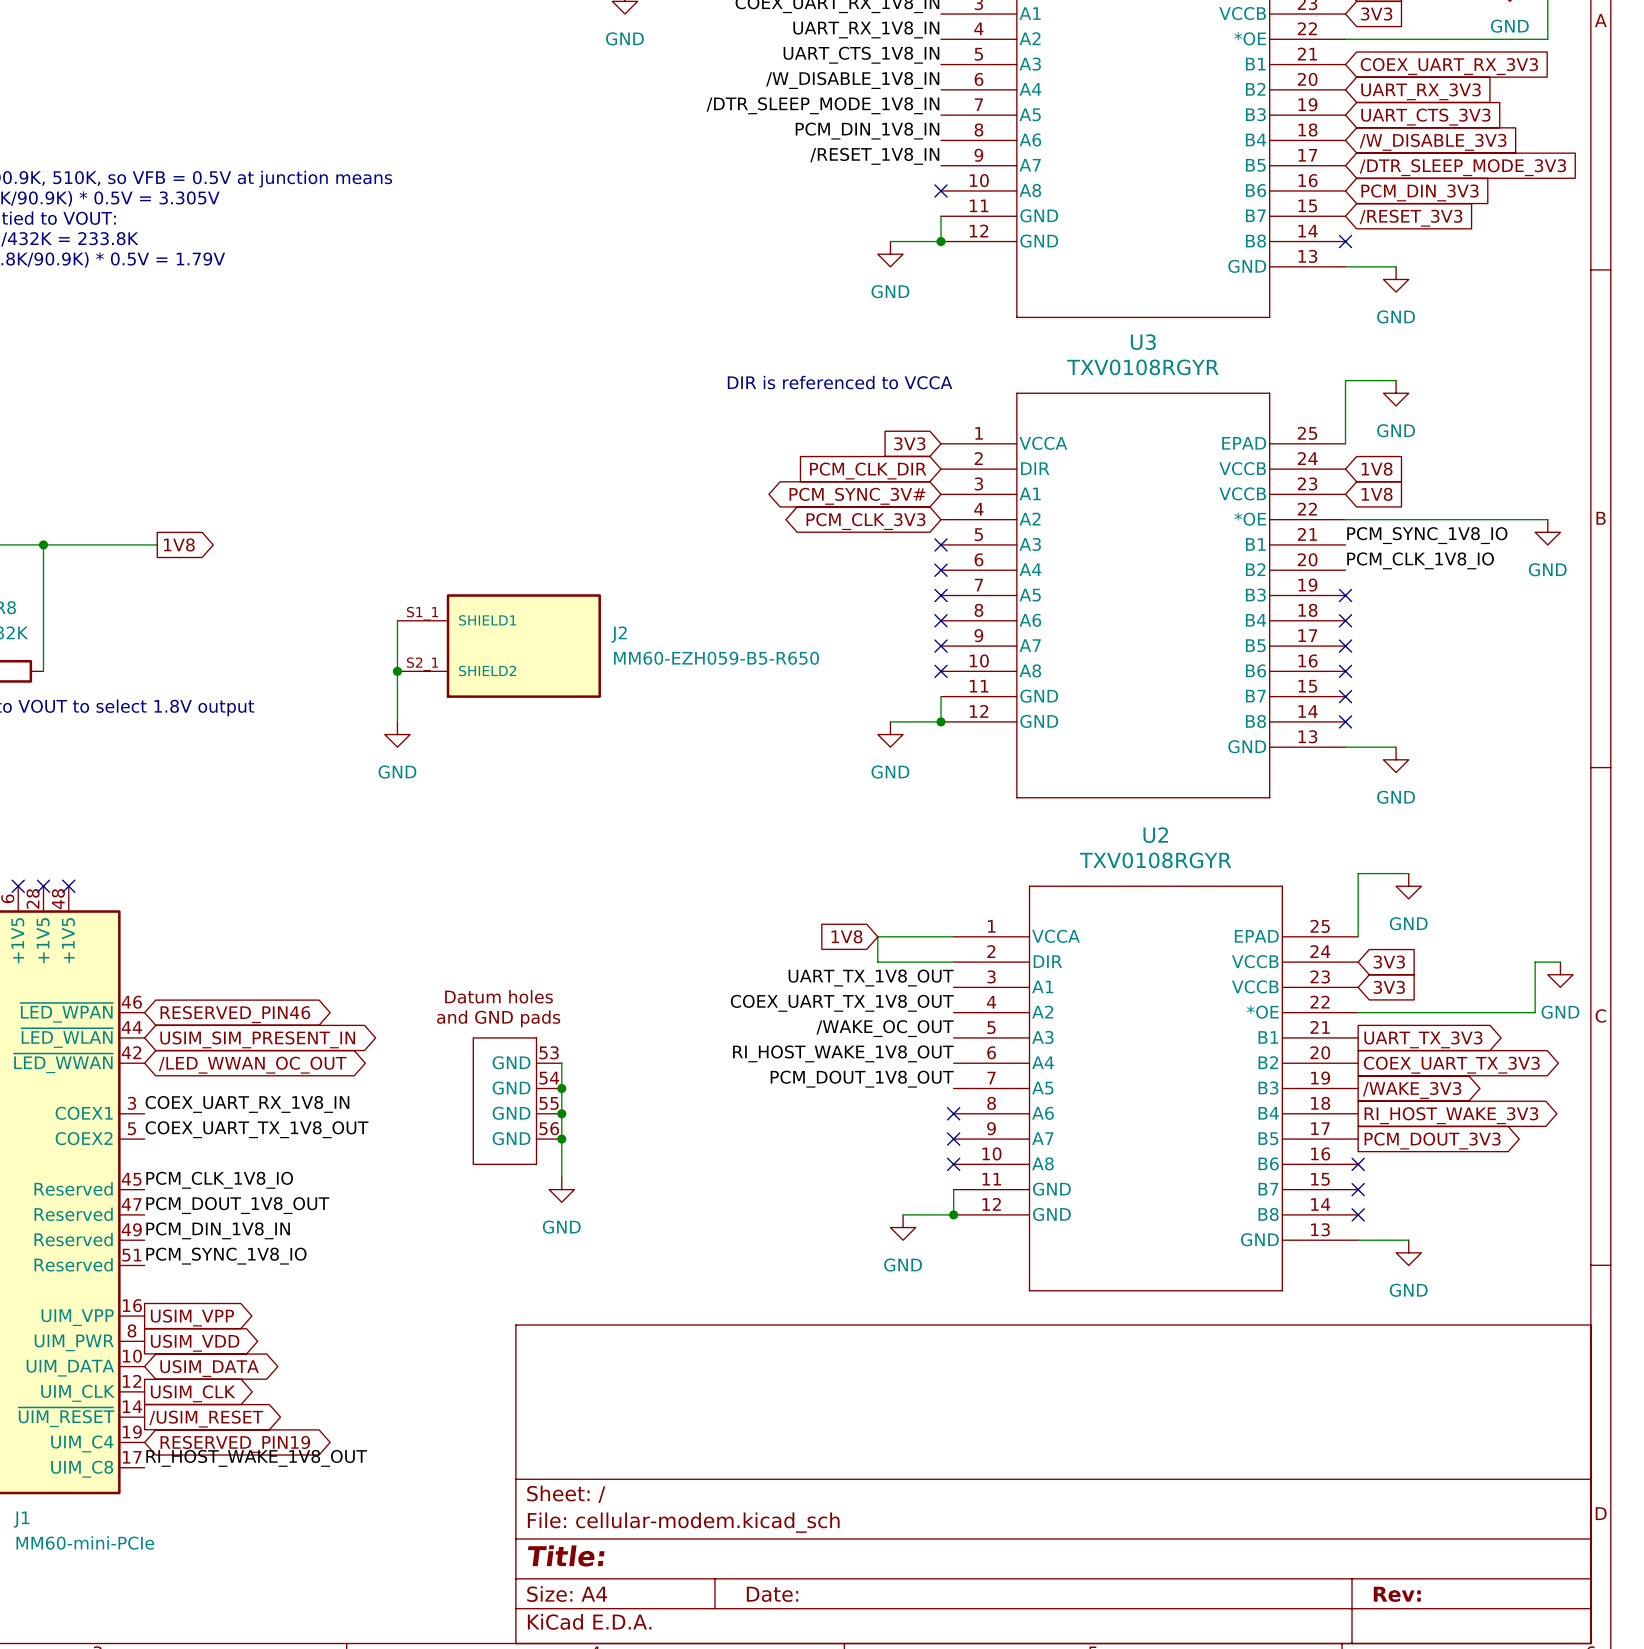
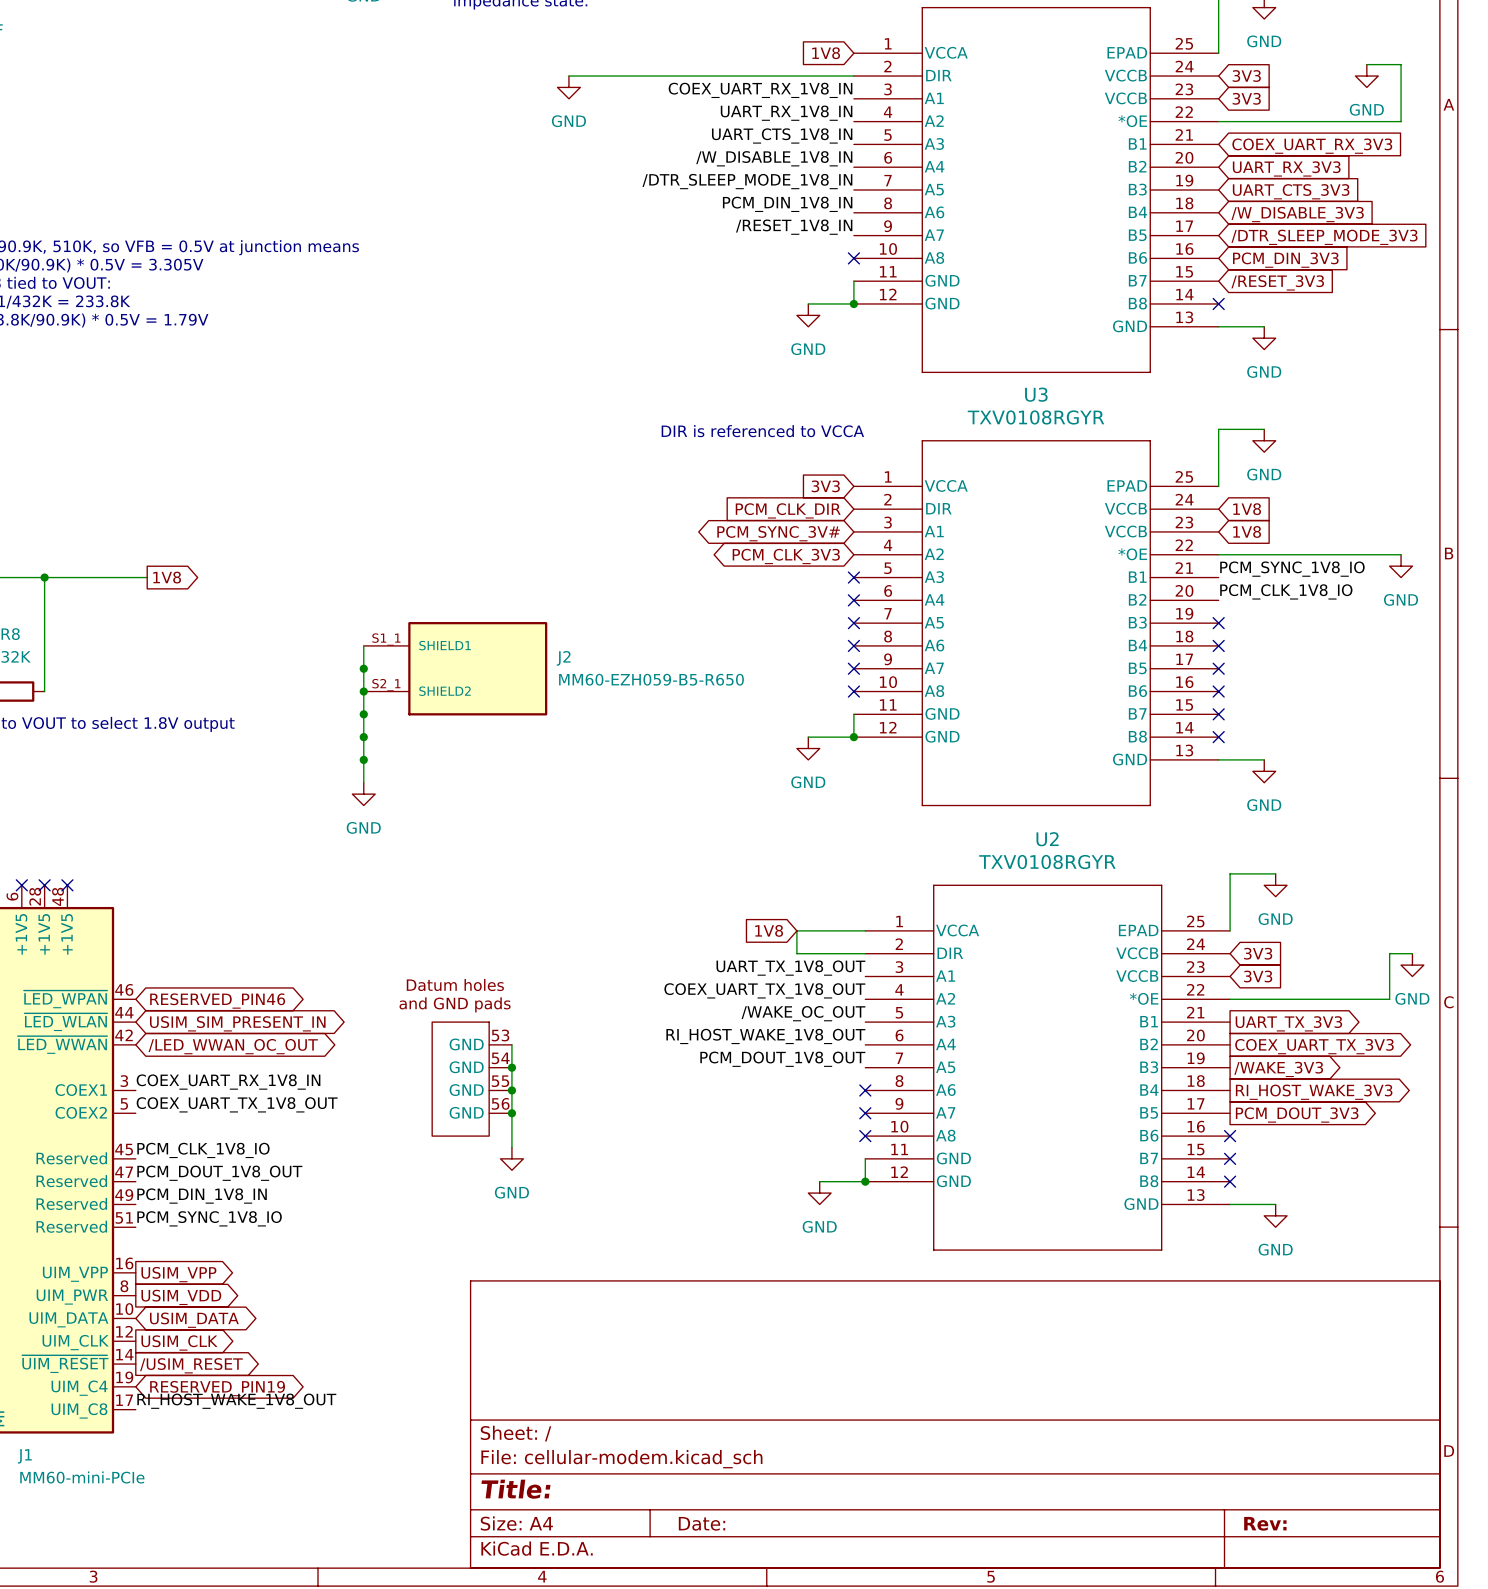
junction: none -> (363, 668)
junction: none -> (363, 714)
wire: none -> (363, 737) (363, 782)
junction: none -> (363, 737)
power symbol position: GND (397, 734) -> GND (363, 794)
junction: none -> (363, 759)

